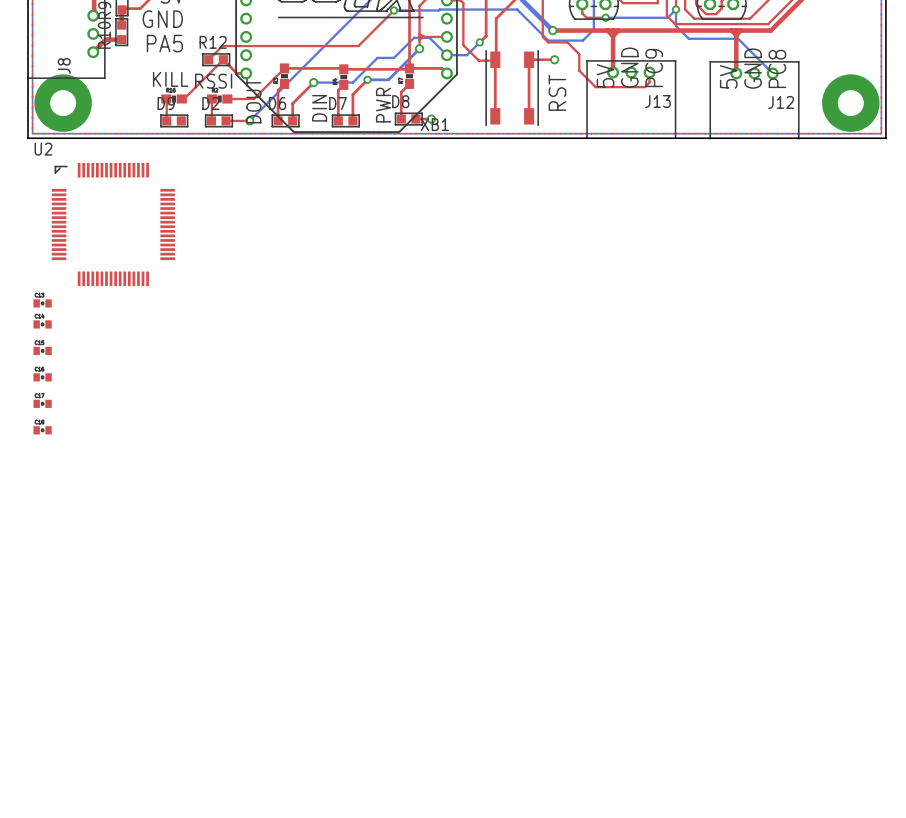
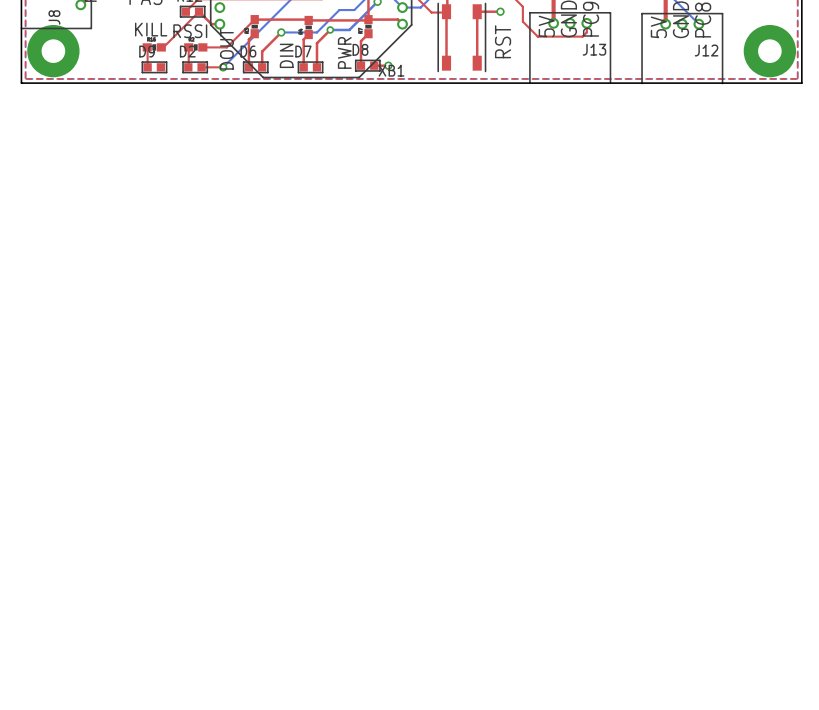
U2: (113, 224) -> none
part: (42, 303) -> none
part: (42, 324) -> none
part: (42, 350) -> none
part: (42, 377) -> none
part: (42, 403) -> none
part: (42, 430) -> none

